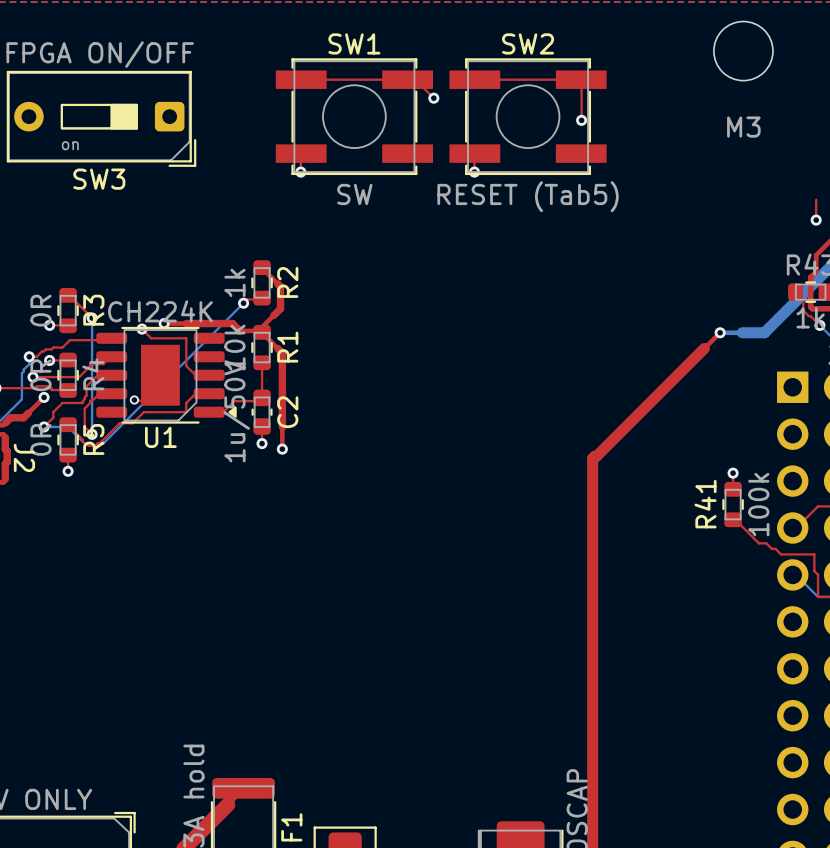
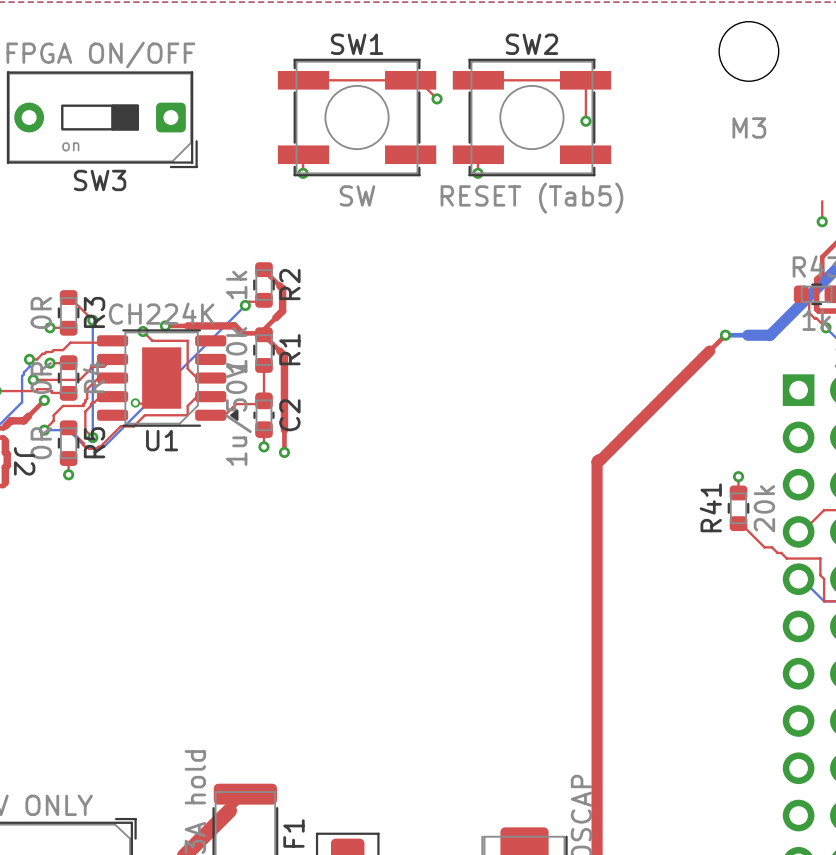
R41 value: 100k (758, 504) -> 20k (764, 508)

